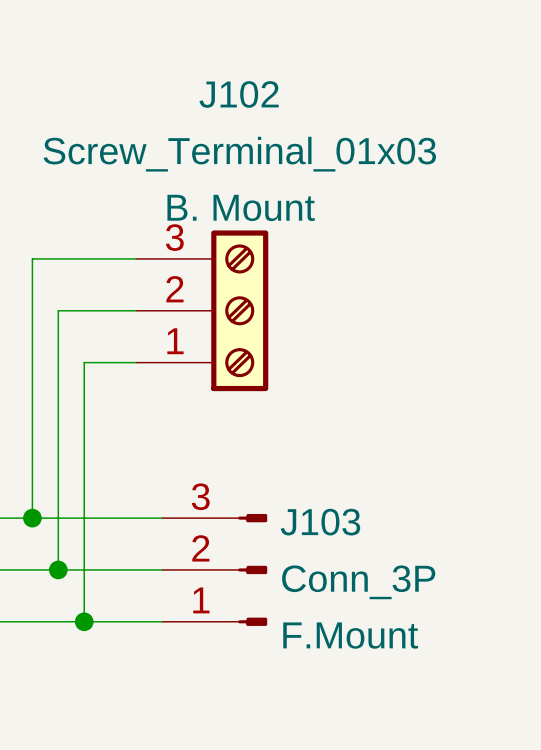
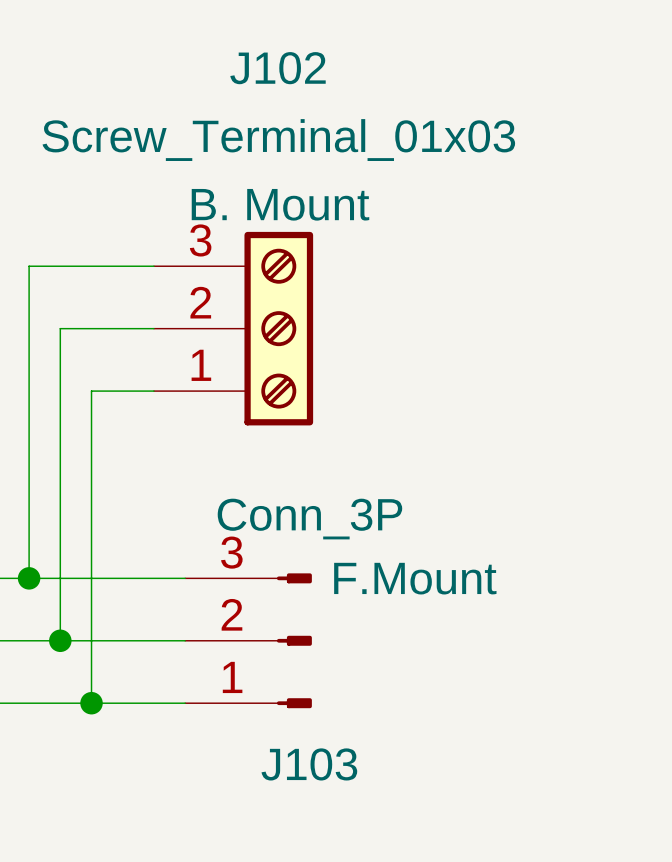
J103 name position: J103 (320, 522) -> J103 (309, 764)
J103 value position: Conn_3P (358, 582) -> Conn_3P (309, 519)
J103 text position: F.Mount (350, 635) -> F.Mount (415, 578)

